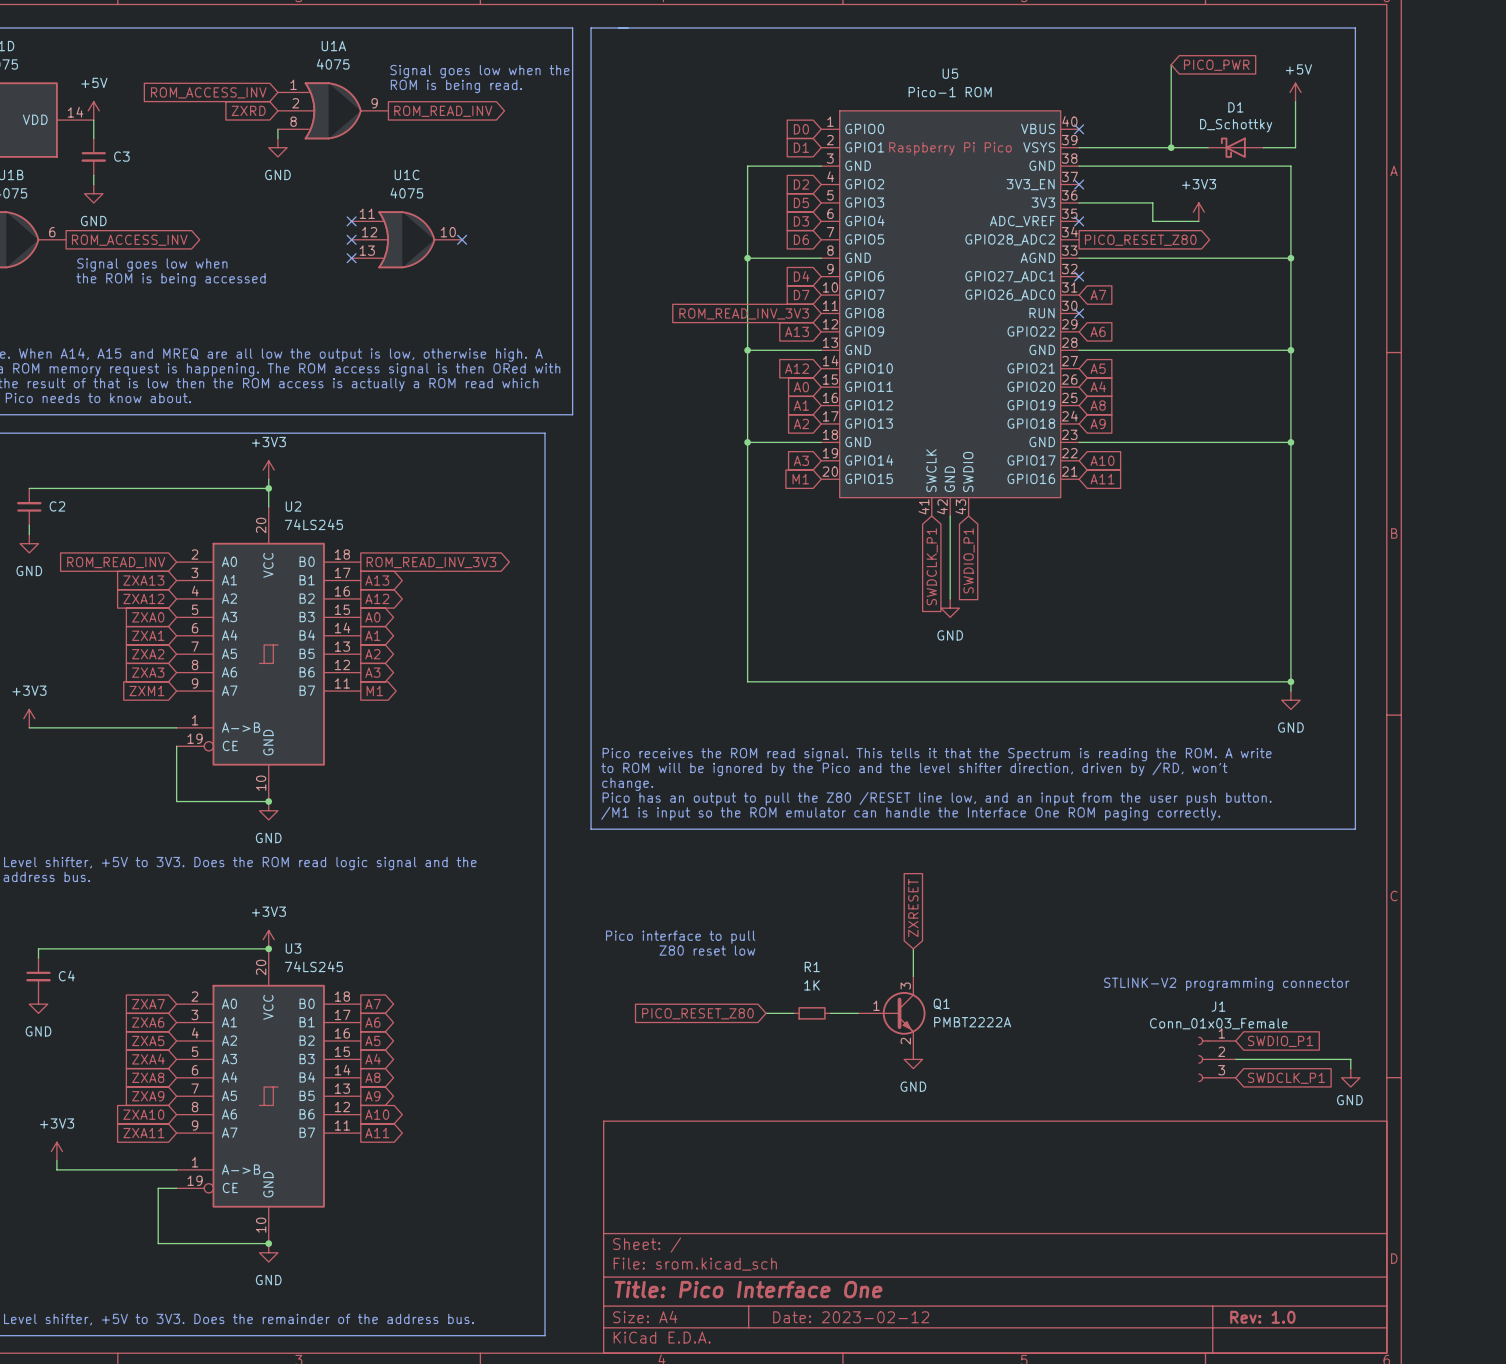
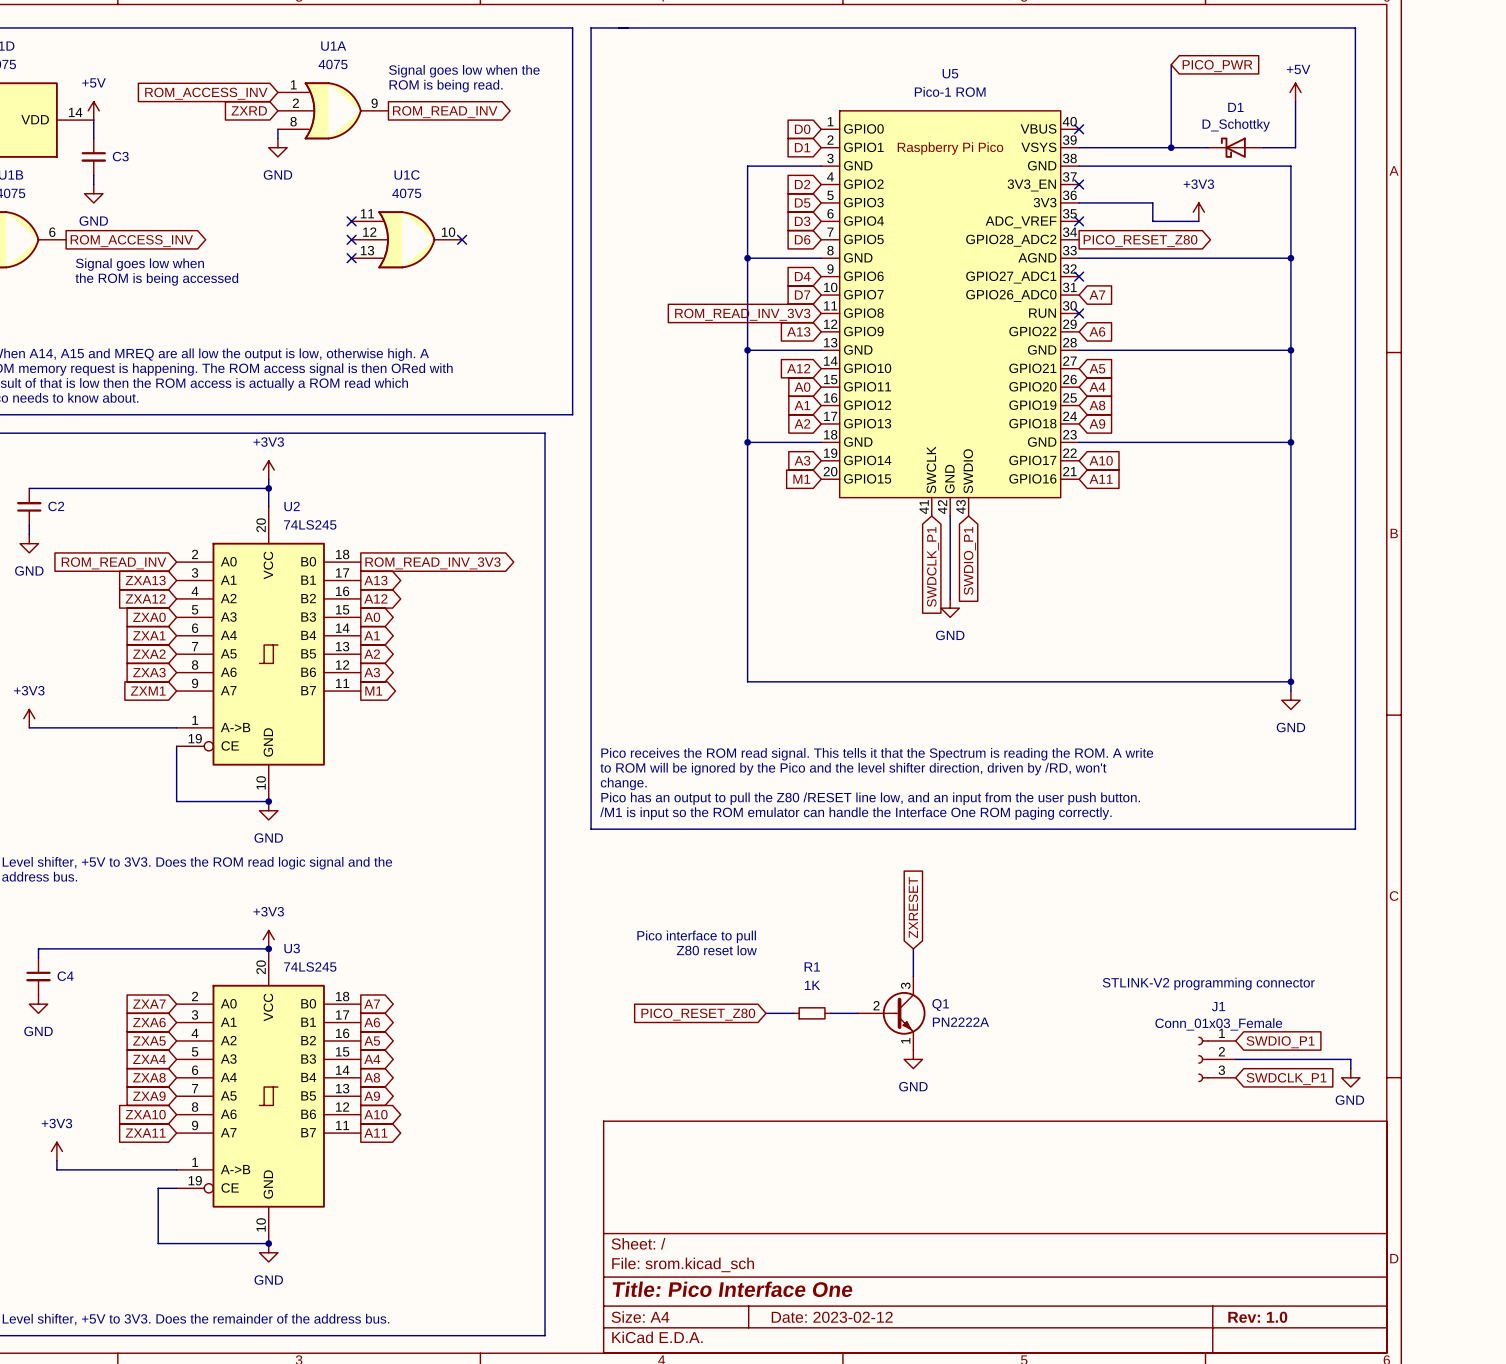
Q1 pin number: 1 (876, 1005) -> 2 (876, 1005)
Q1 value: PMBT2222A (972, 1022) -> PN2222A (960, 1022)
Q1 pin number: 2 (905, 1041) -> 1 (905, 1040)

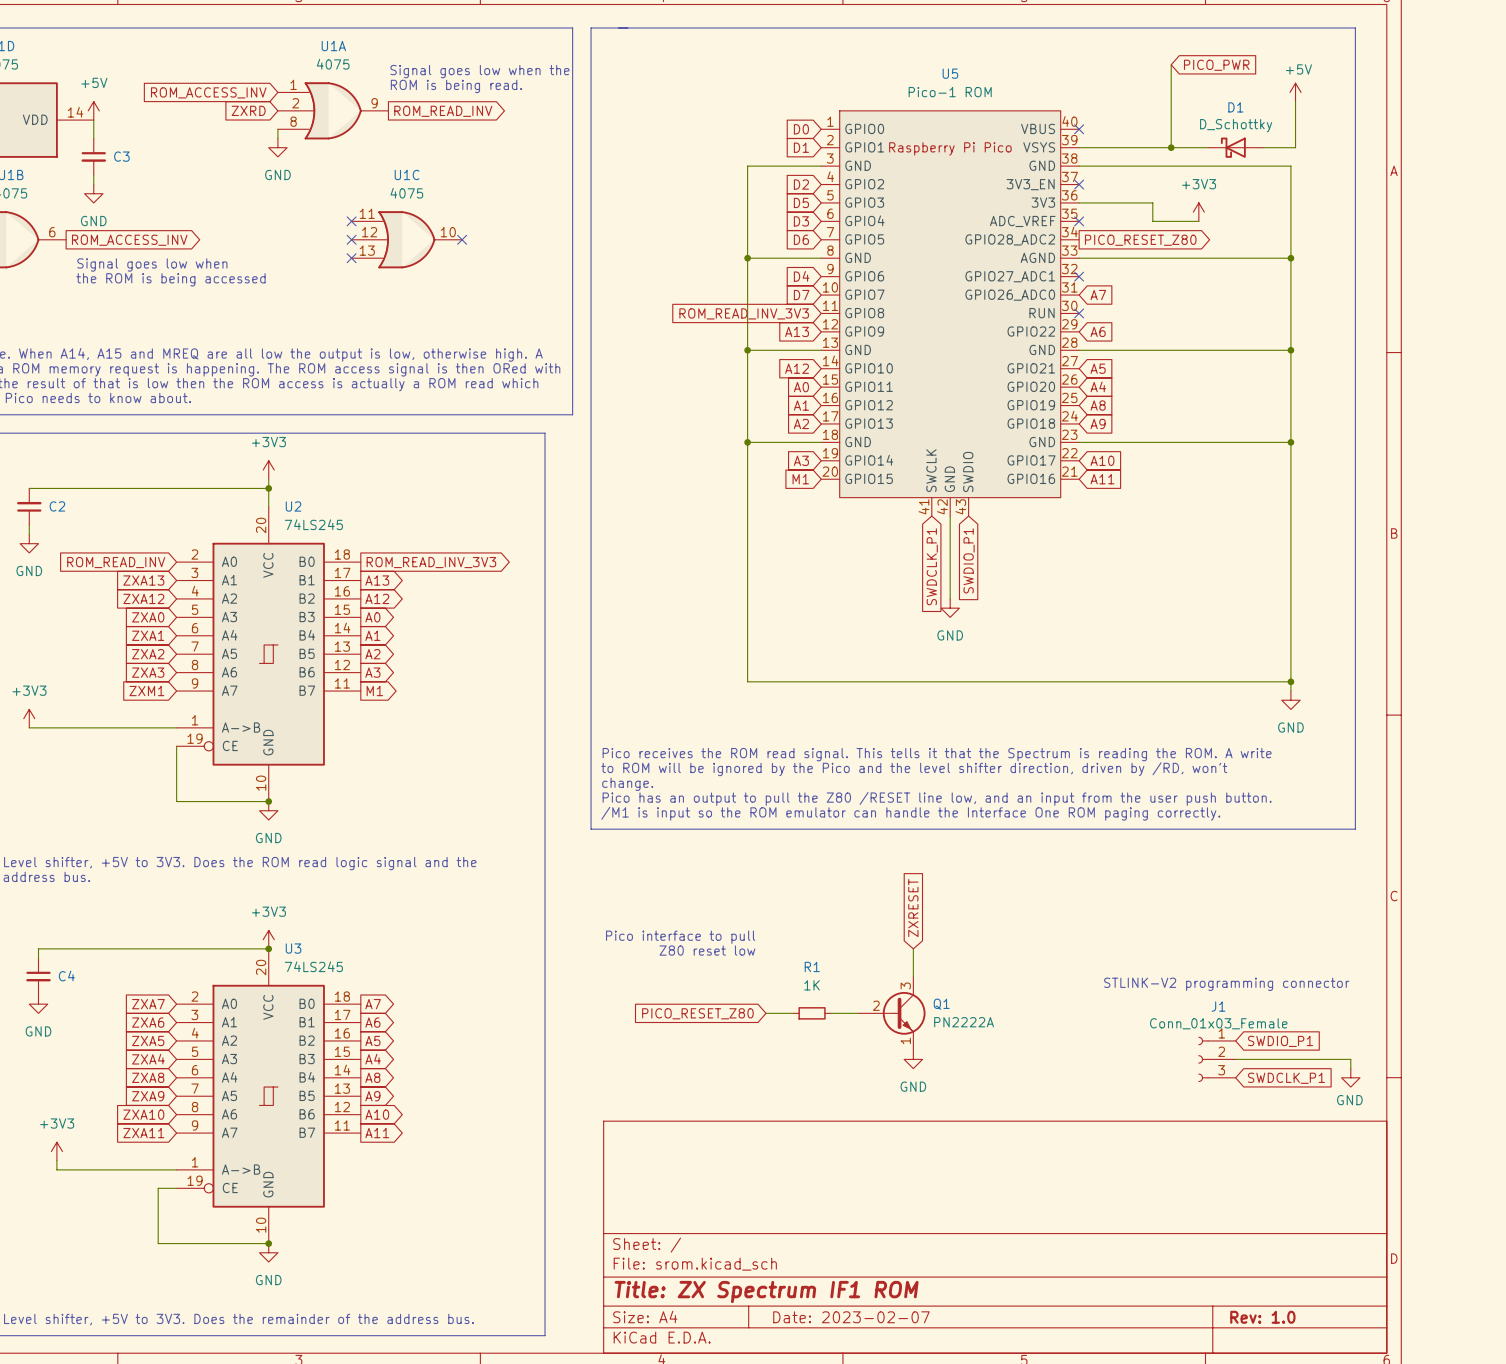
title block: Title: Pico Interface One (732, 1289) -> Title: ZX Spectrum IF1 ROM (766, 1292)
title block: Date: 2023-02-12 (832, 1317) -> Date: 2023-02-07 (851, 1317)

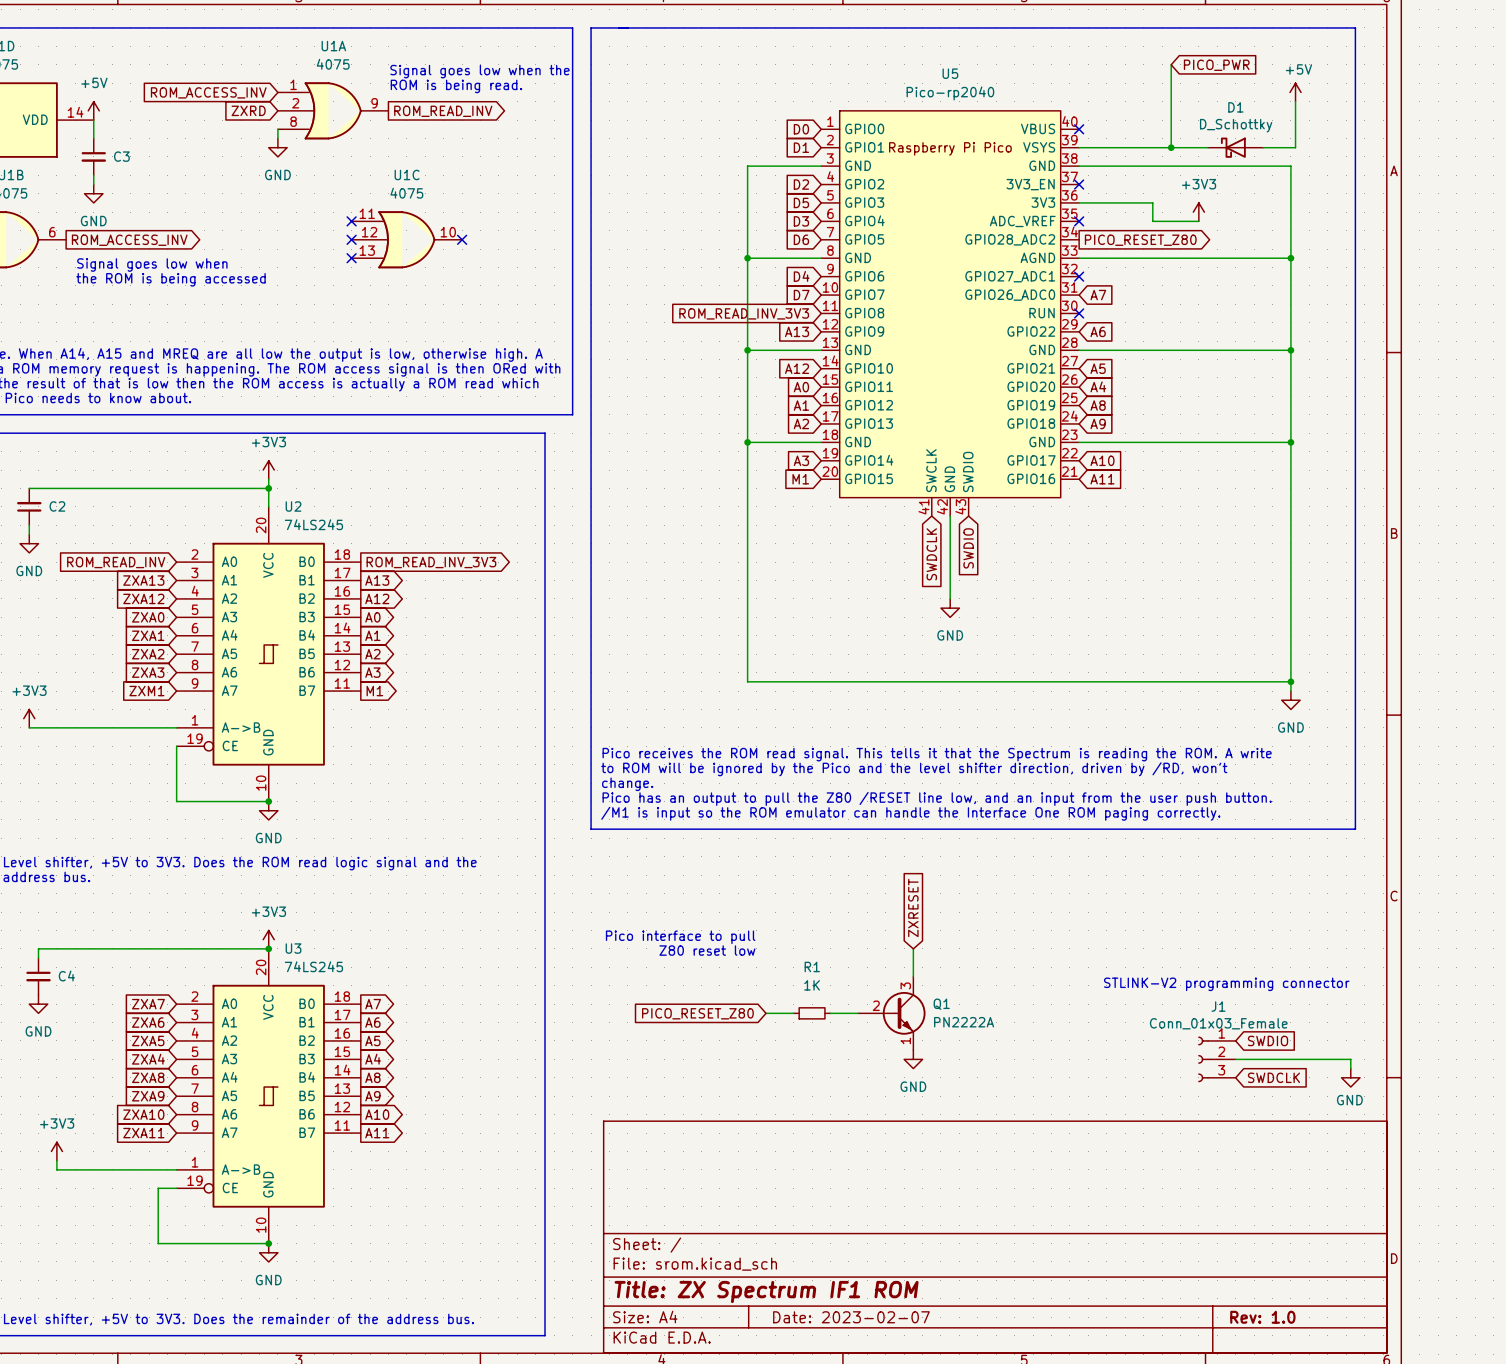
U5 value: Pico-1 ROM (950, 92) -> Pico-rp2040 (950, 93)
global label: SWDIO_P1 (969, 560) -> SWDIO (968, 548)
global label: SWDCLK_P1 (932, 566) -> SWDCLK (931, 554)
global label: SWDIO_P1 (1280, 1041) -> SWDIO (1268, 1040)
global label: SWDCLK_P1 (1286, 1078) -> SWDCLK (1273, 1077)

